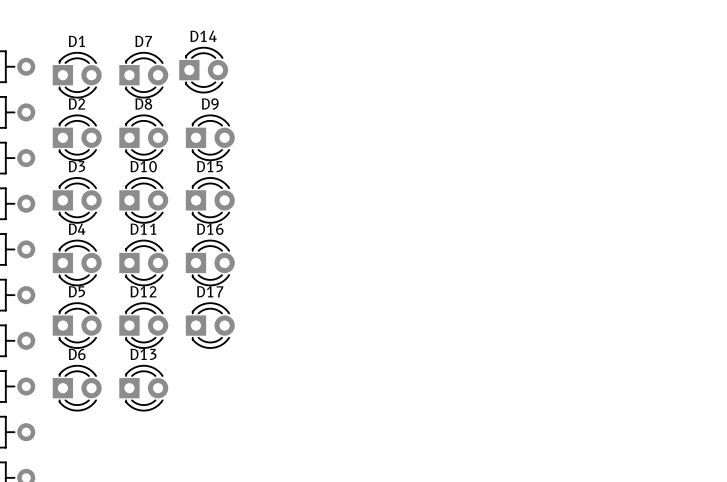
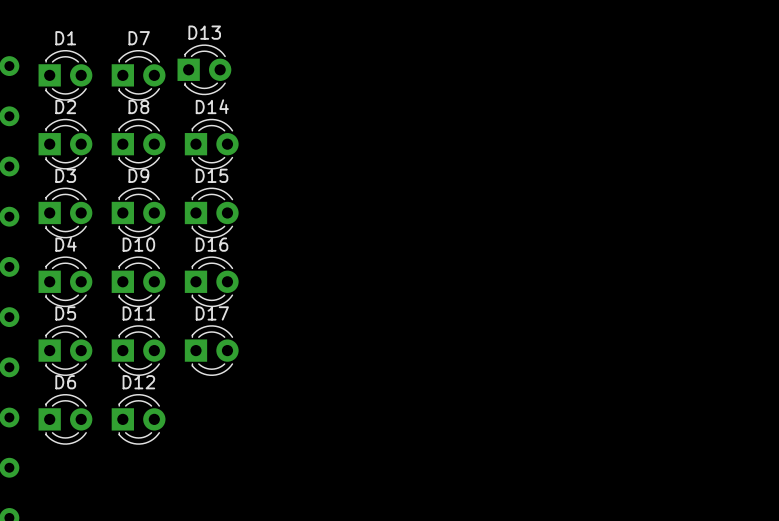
D14 name: D14 (203, 36) -> D13 (204, 32)
D9 name: D9 (210, 104) -> D14 (212, 106)
D10 name: D10 (143, 166) -> D9 (138, 175)
D11 name: D11 (143, 229) -> D10 (138, 244)
D12 name: D12 (143, 291) -> D11 (138, 313)
D13 name: D13 (143, 354) -> D12 (138, 382)

